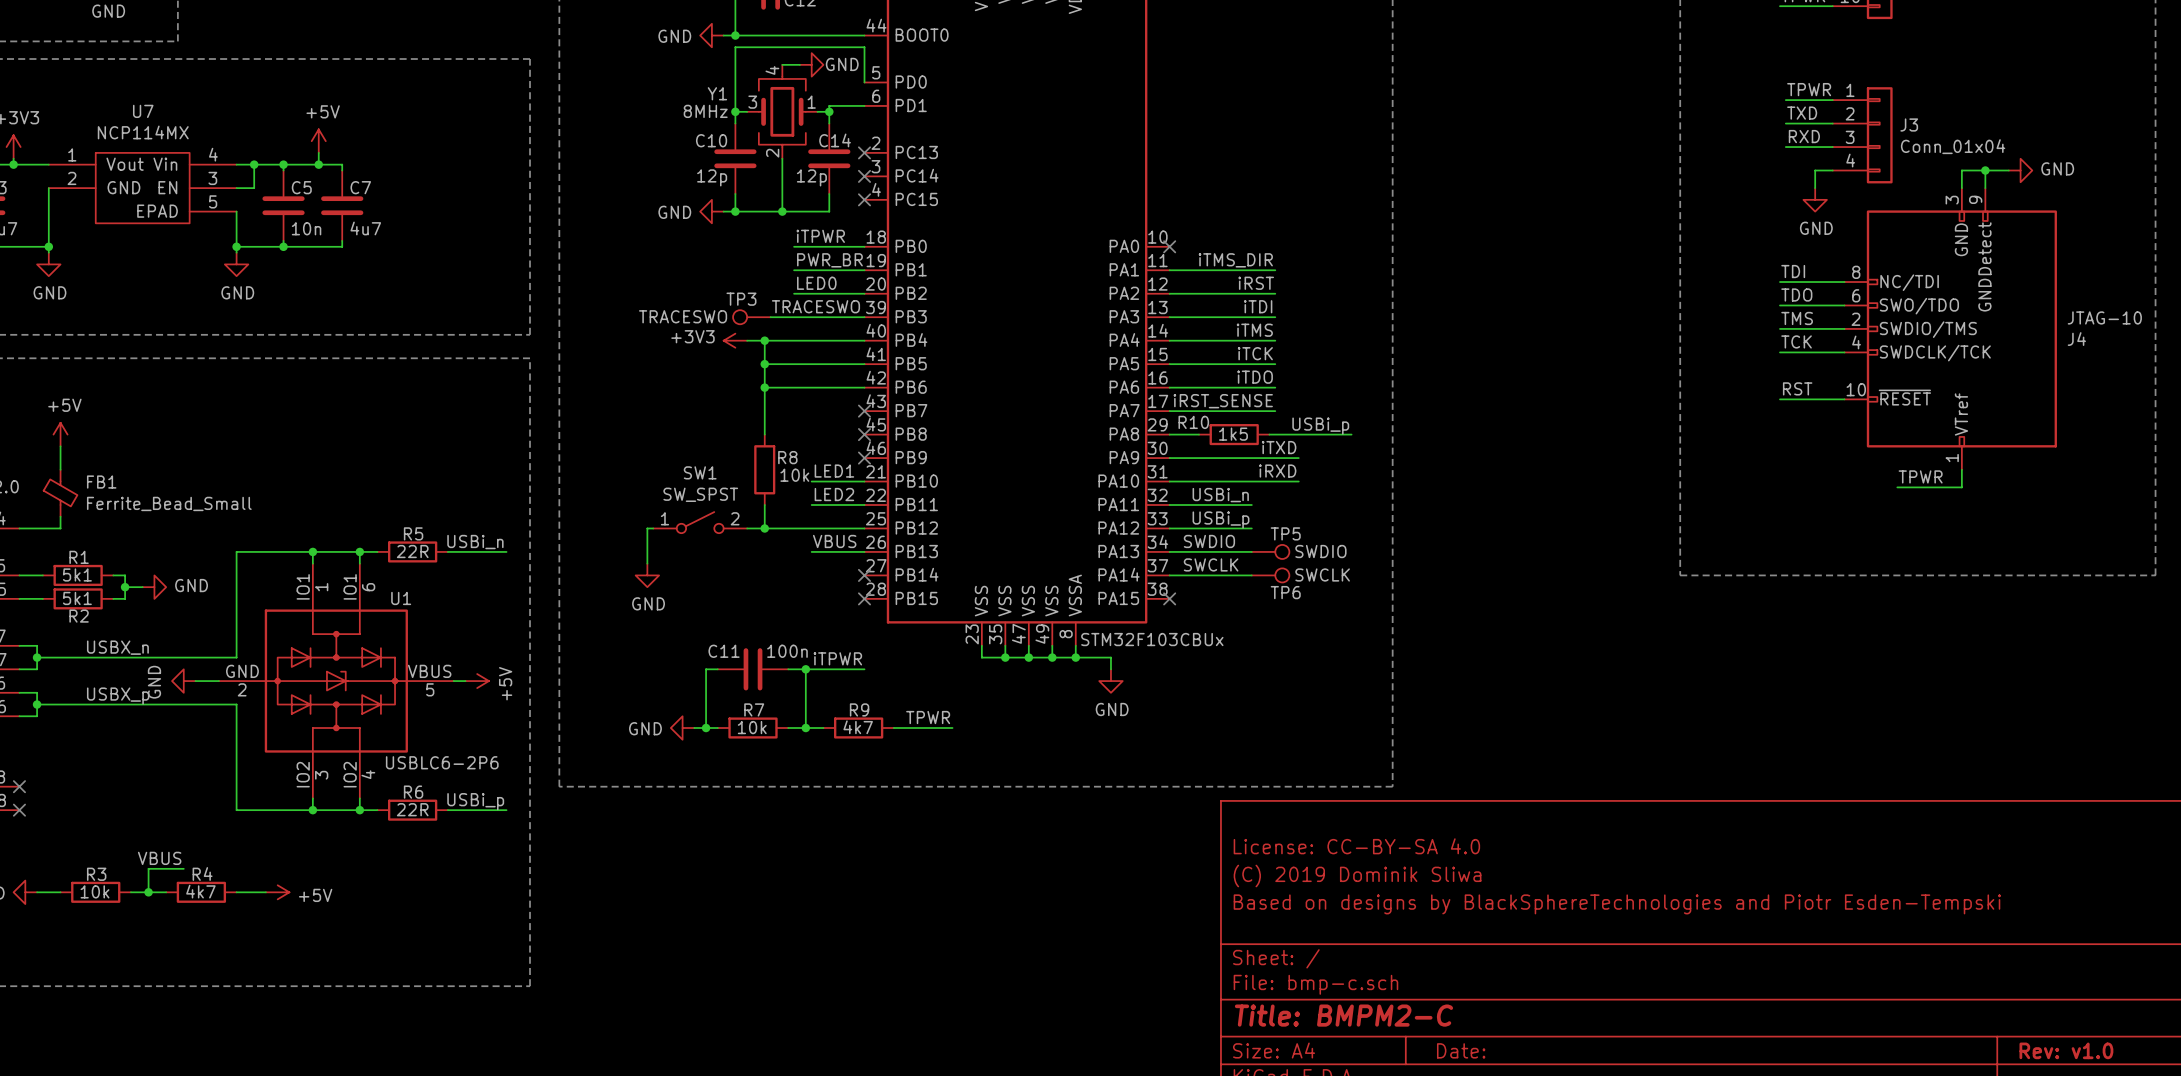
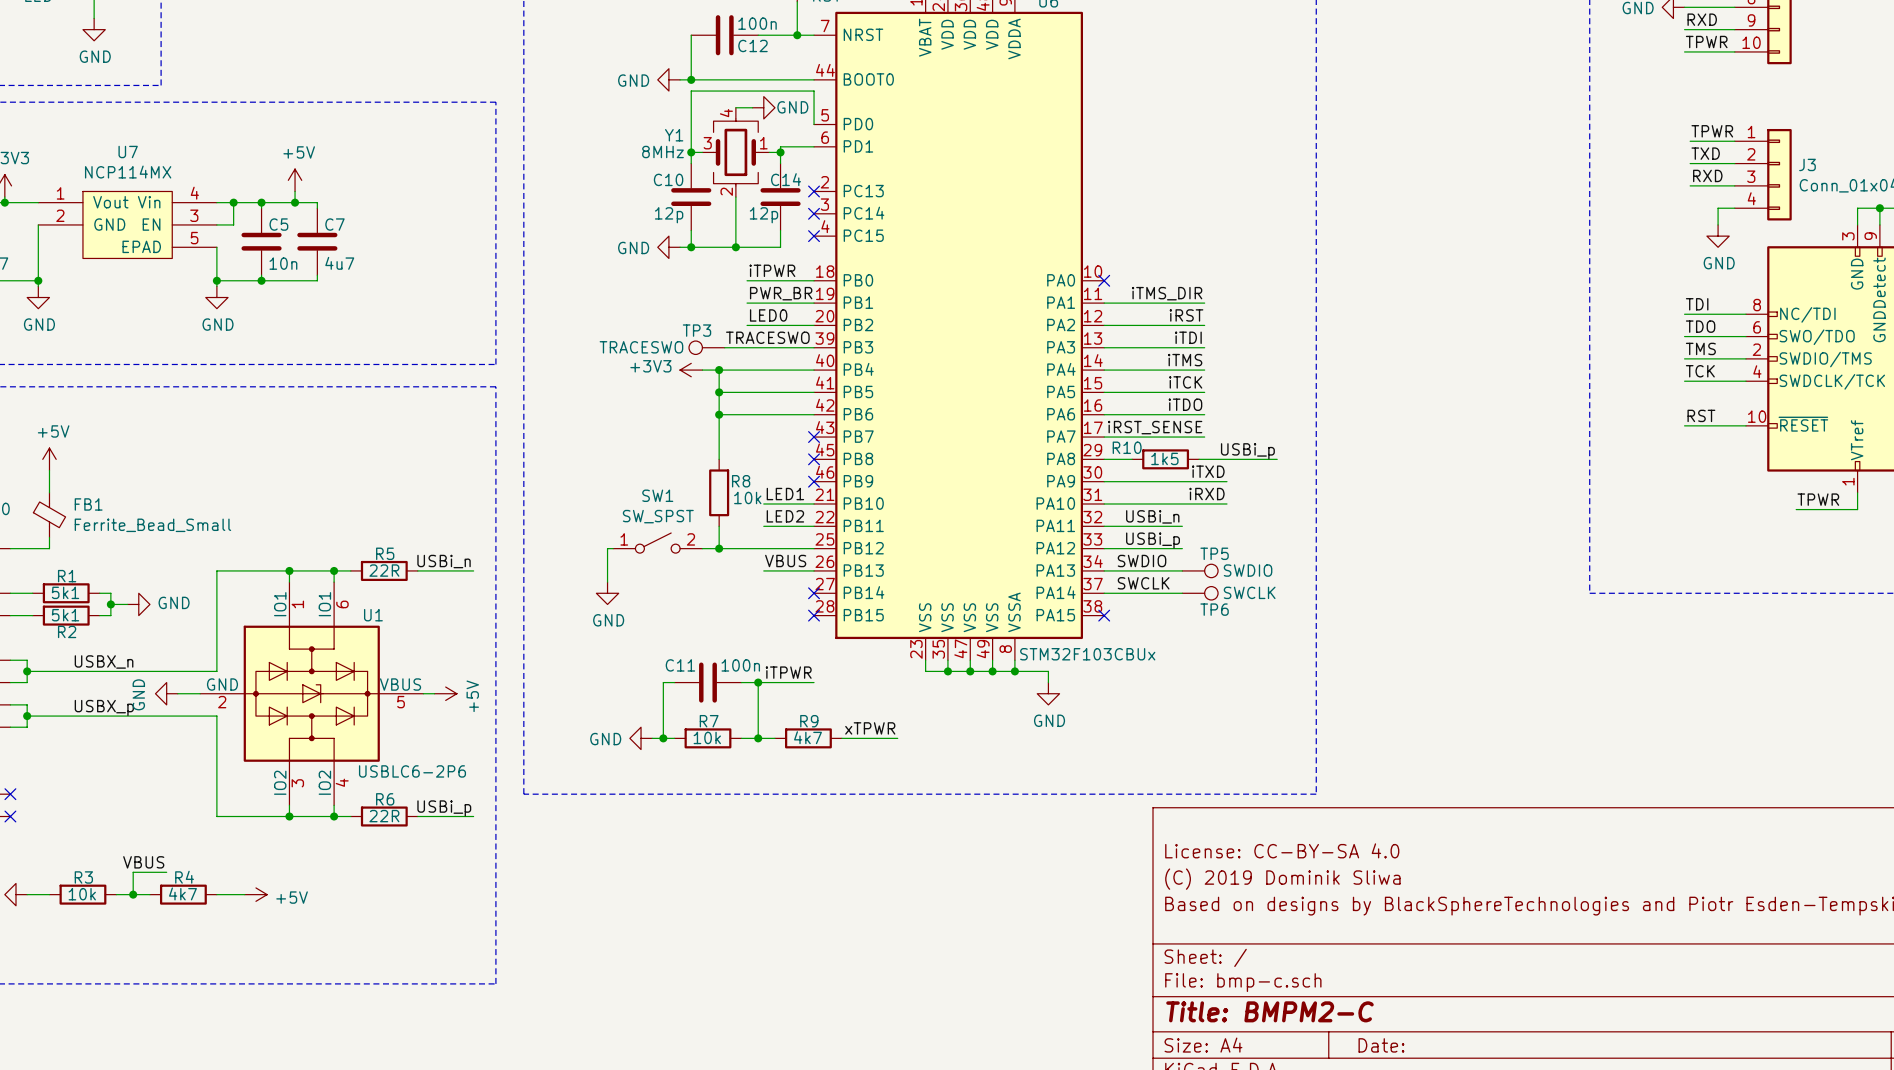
label: TPWR (928, 717) -> xTPWR (870, 728)

